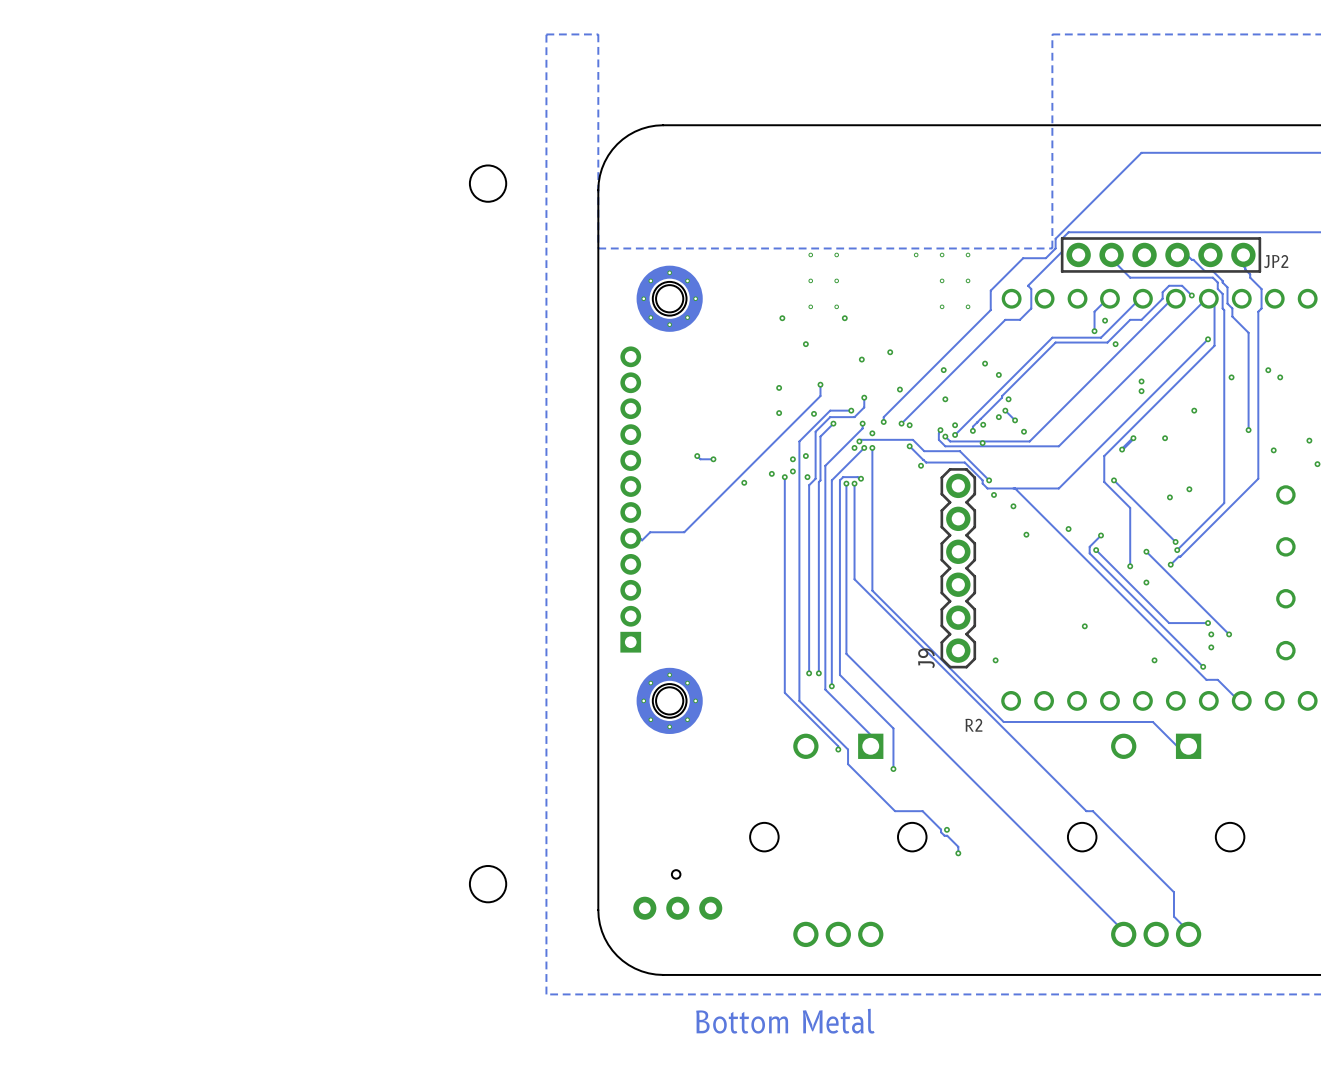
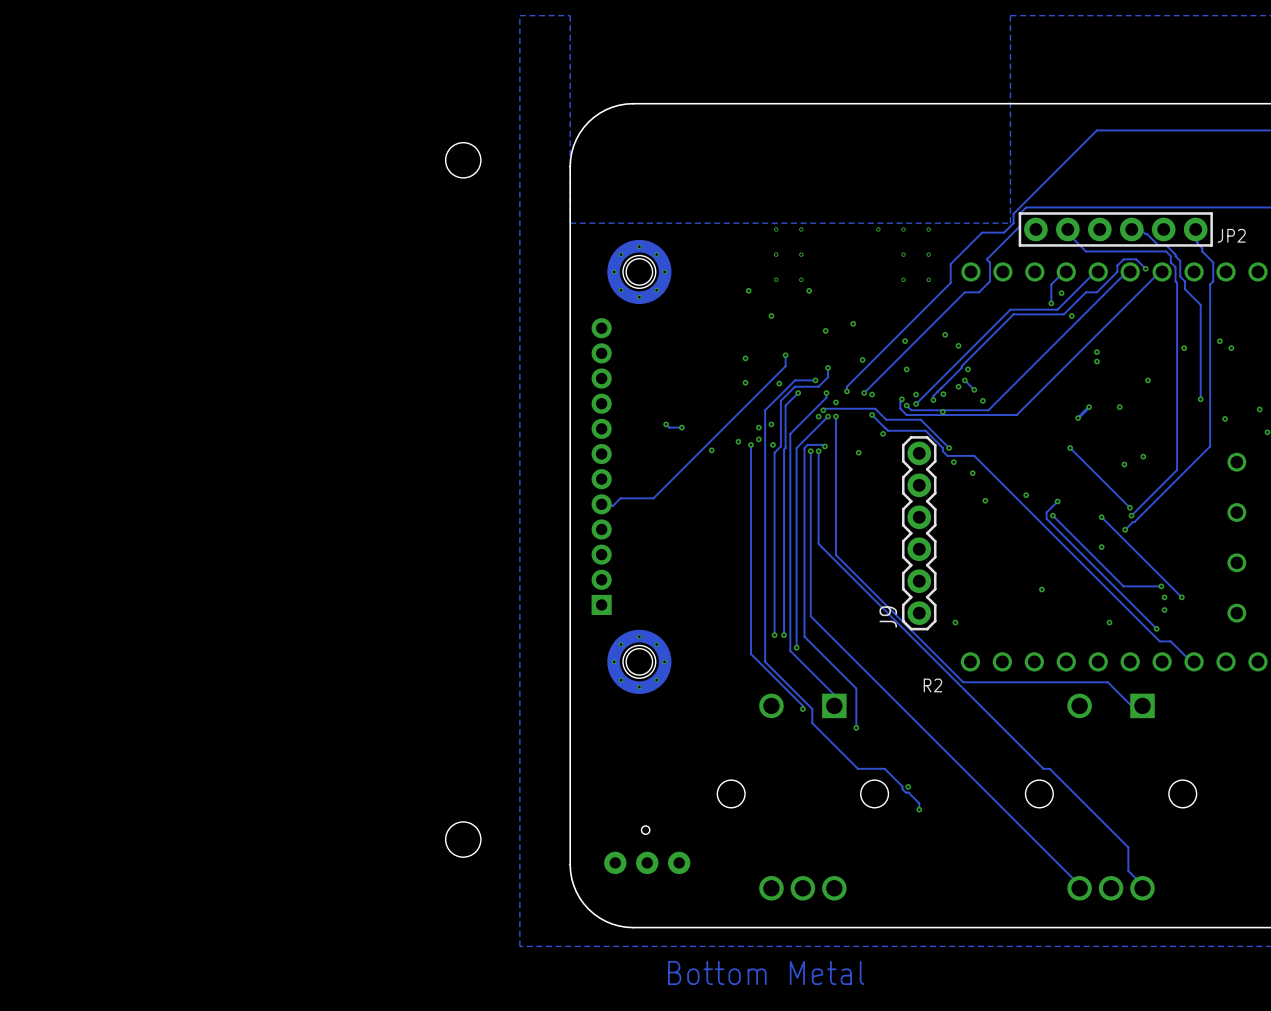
track: (1208, 298) (1214, 300) (1214, 345) (1104, 456) (1104, 481) (1130, 507) (1130, 566) -> none
track: (1208, 339) (1058, 488) (1015, 488) -> none
via: (1208, 339) -> none
via: none -> (858, 452)
via: (1130, 566) -> none

